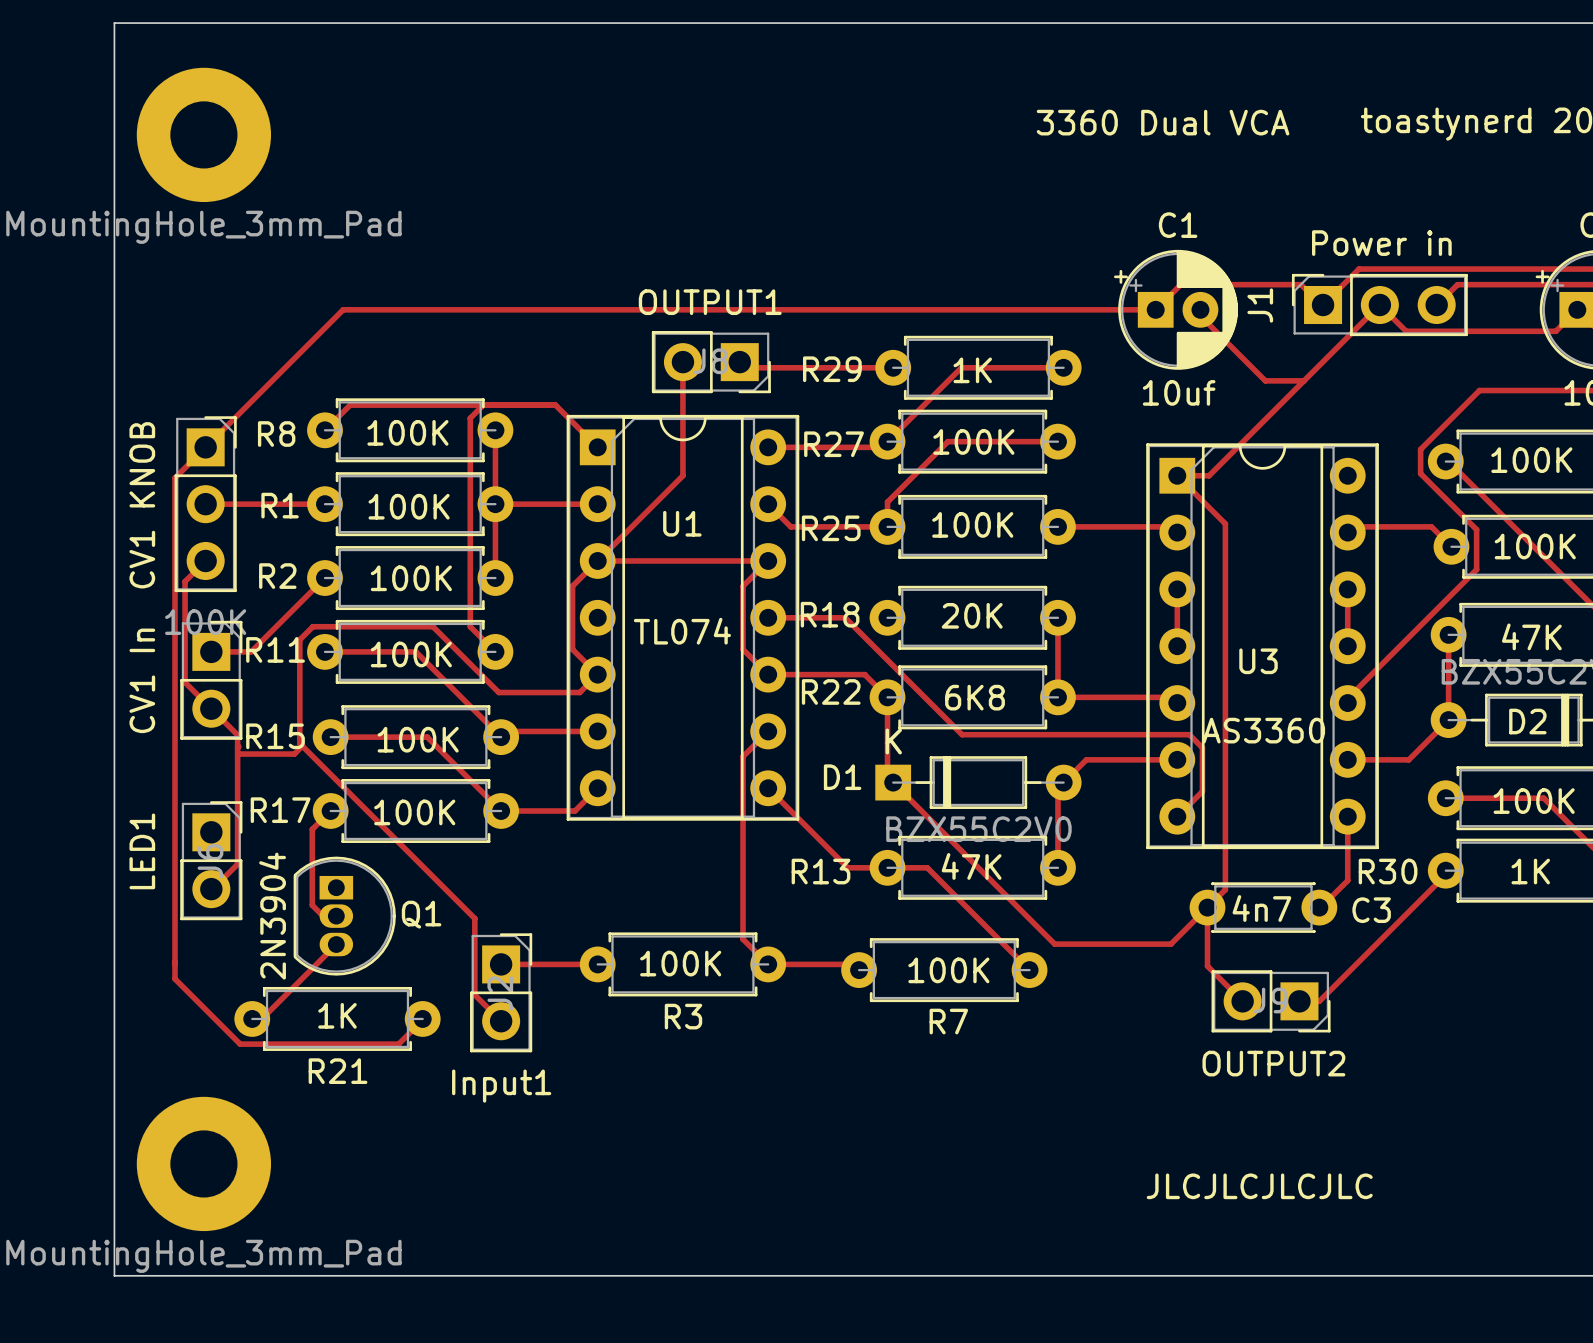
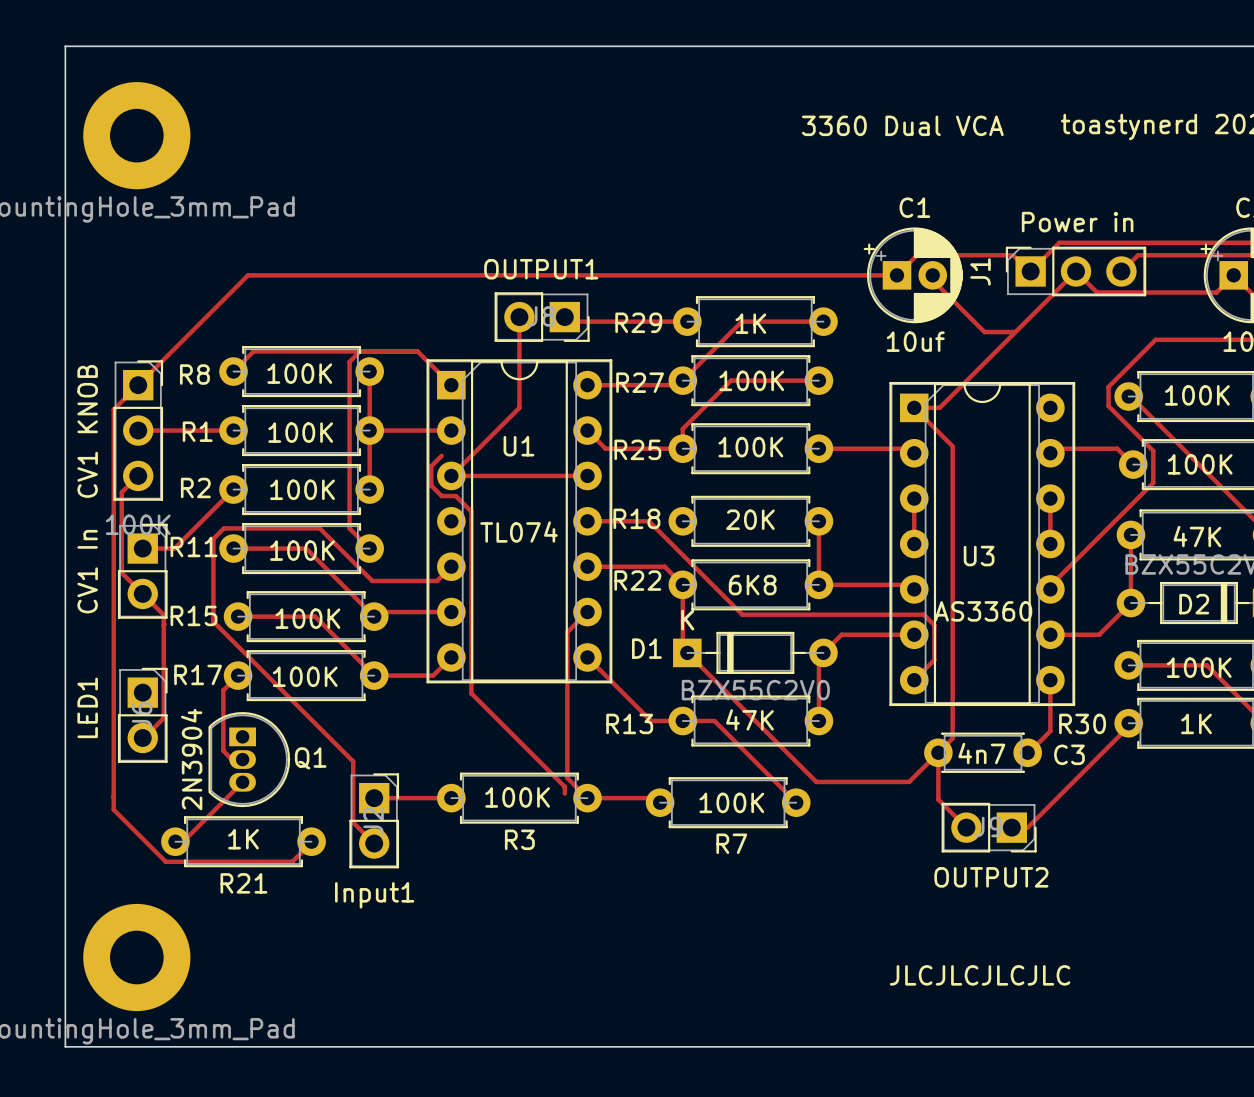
track: none -> (441, 455) (431, 466) (431, 485) (441, 496) (455, 496) (471, 511) (471, 693) (564, 786) (564, 793)
track: (604, 560) (597, 560) (572, 586) (572, 649) (597, 674) -> none
track: (768, 560) (743, 586) (743, 649) (768, 674) -> none
track: (302, 746) (294, 754) (237, 754) -> none

